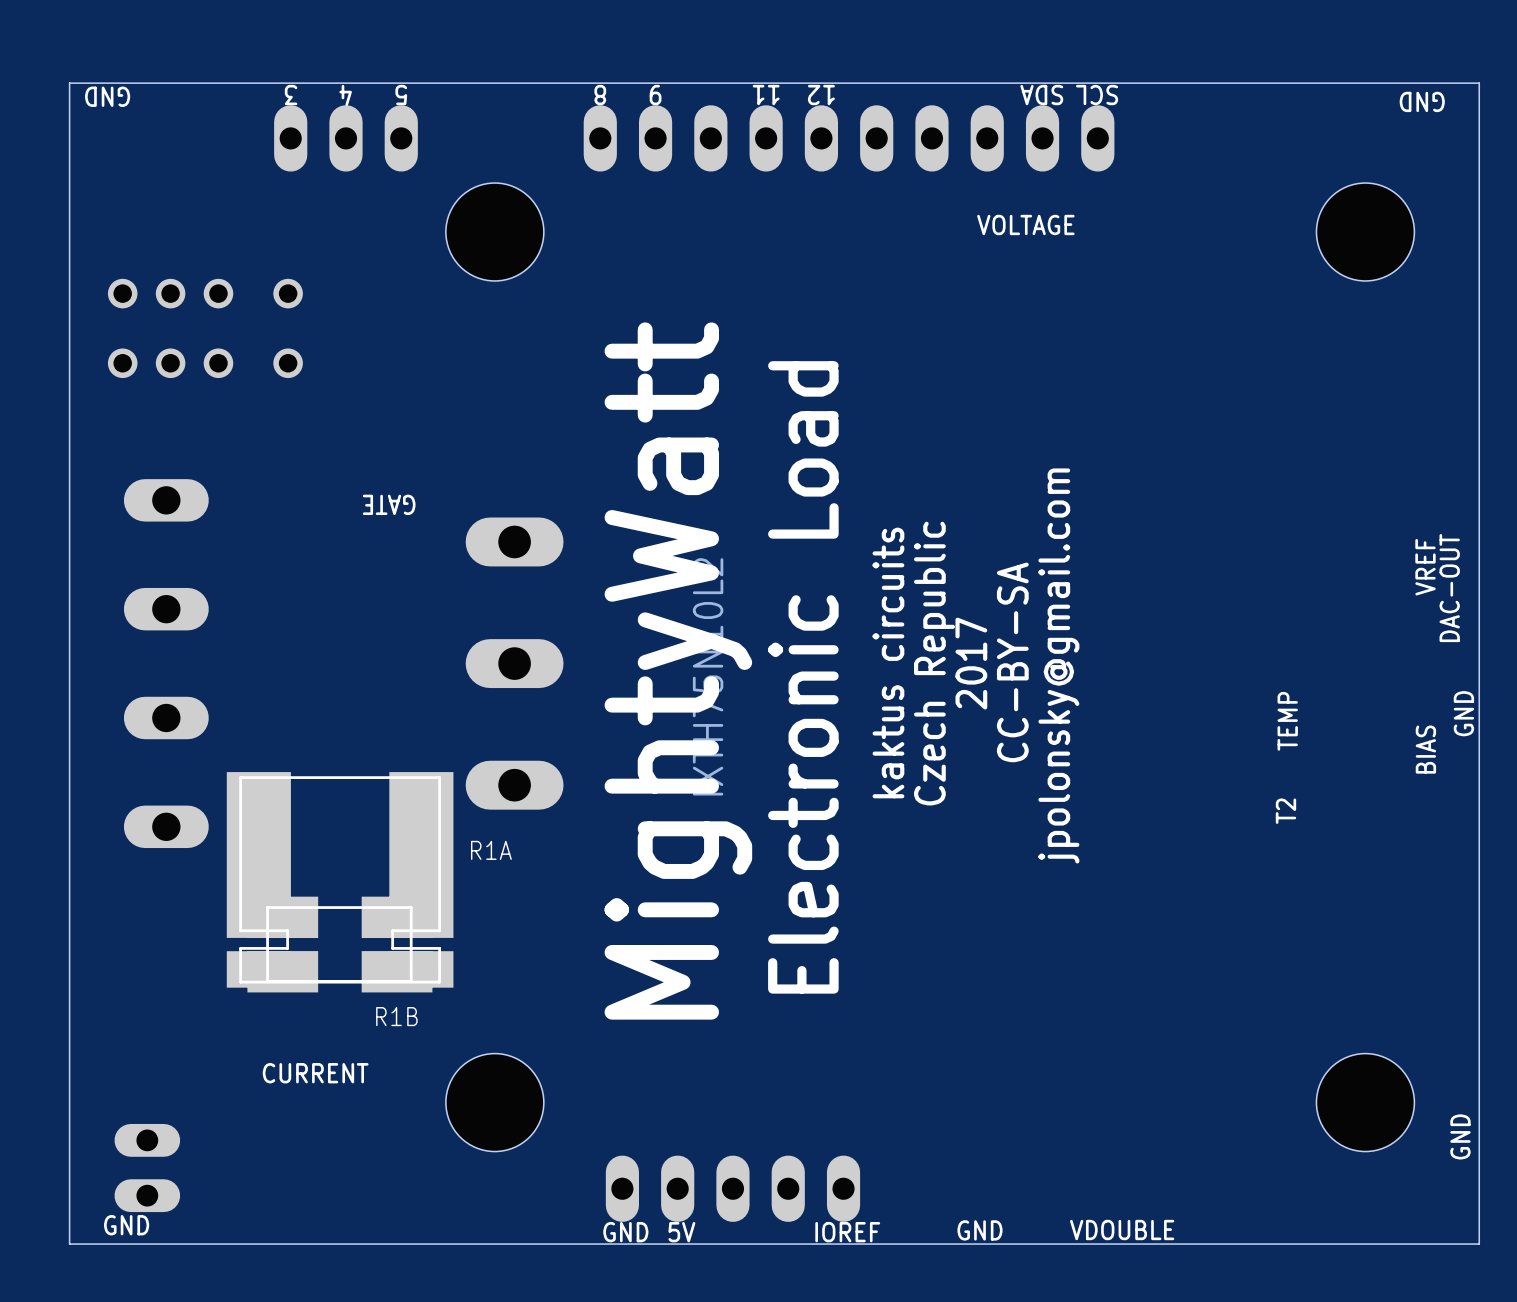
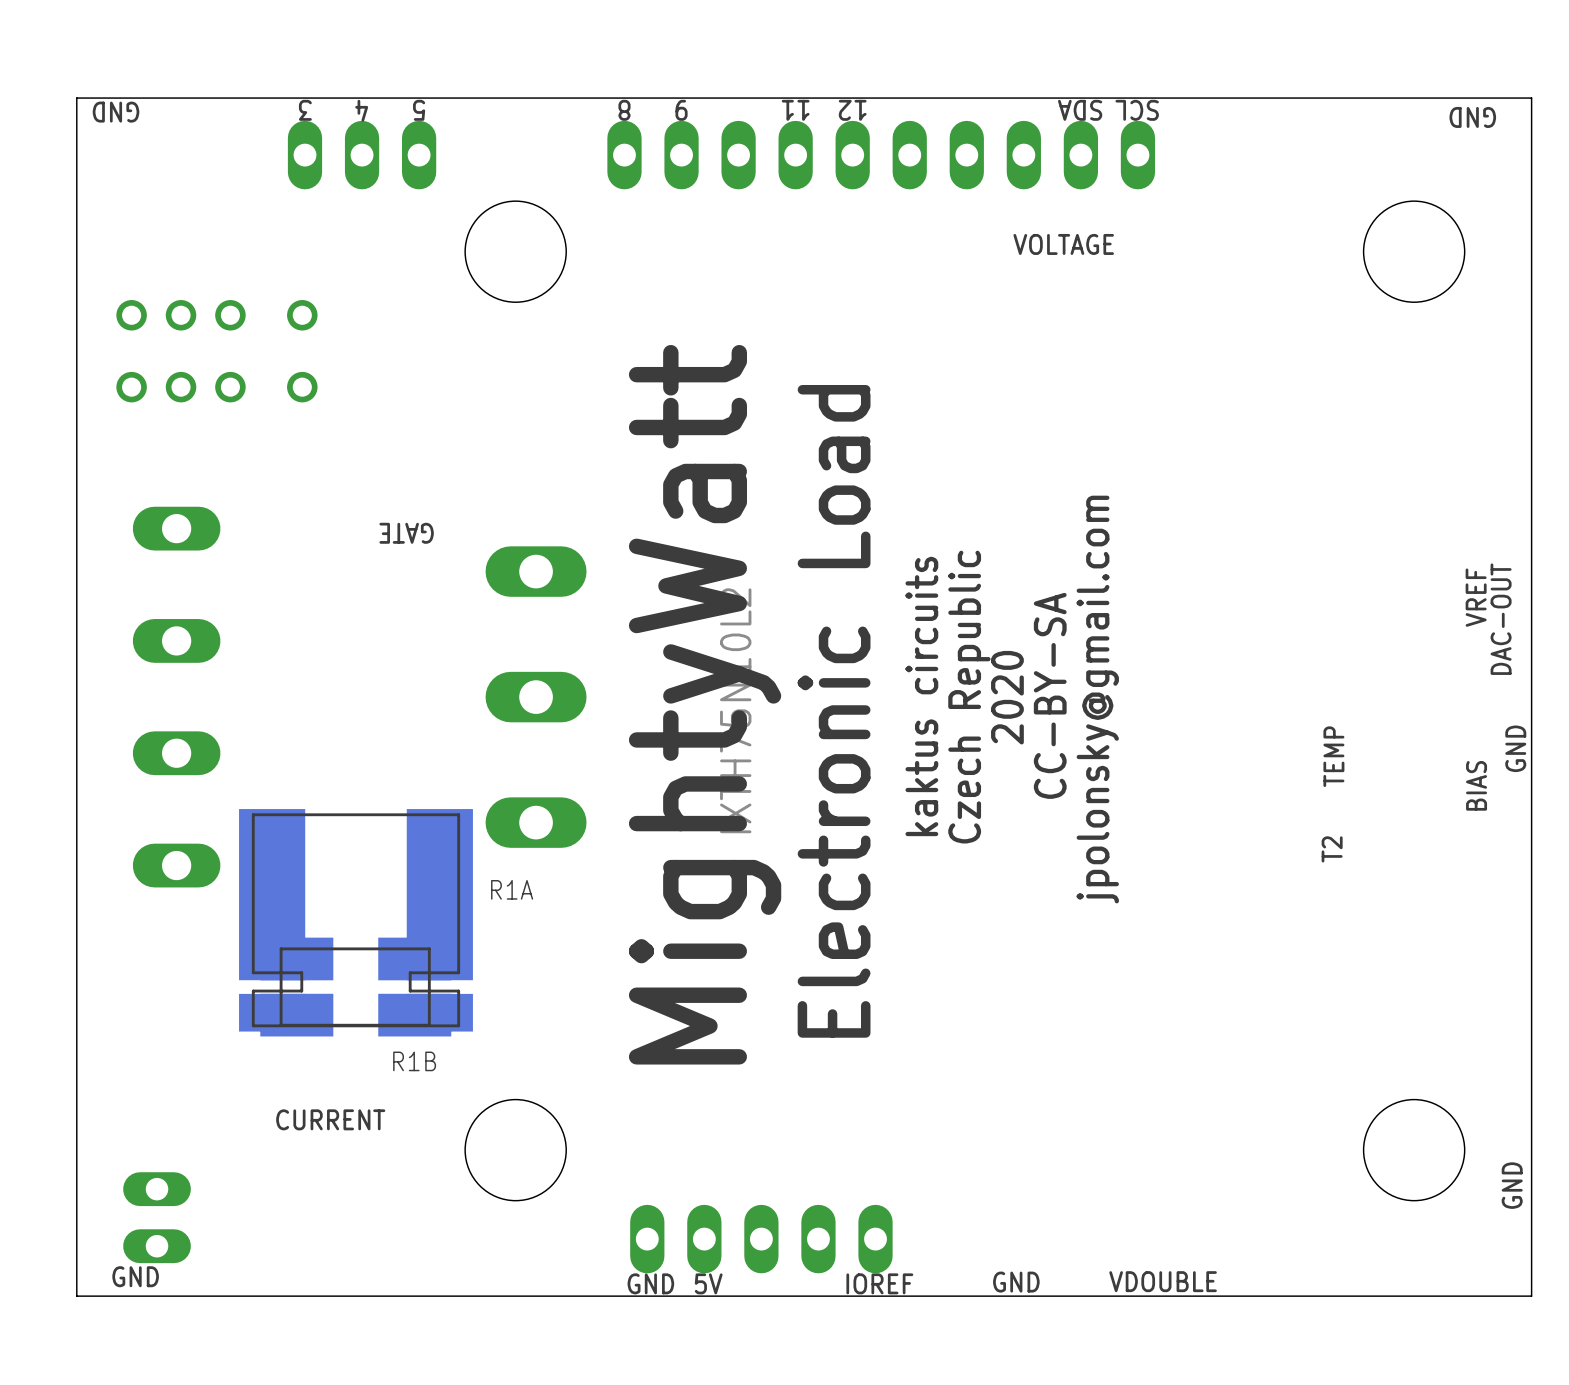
text: 2017 (971, 663) -> 2020 (1007, 697)

